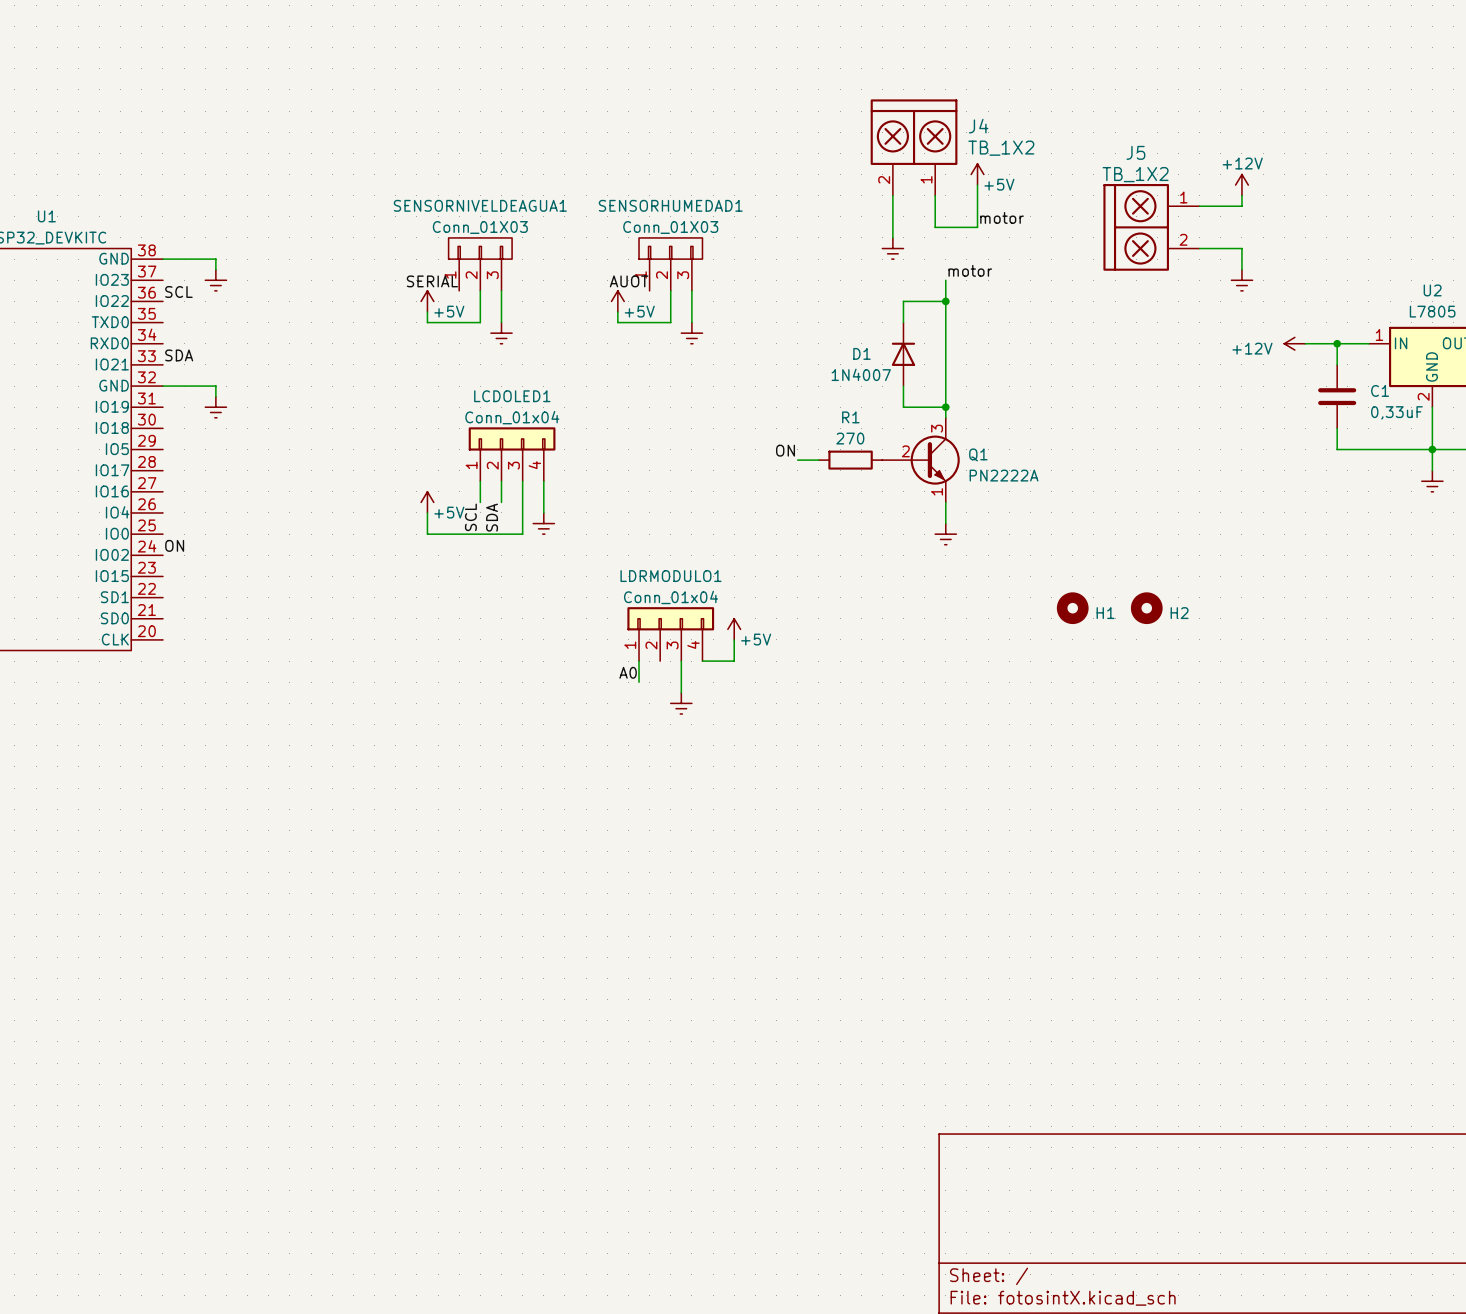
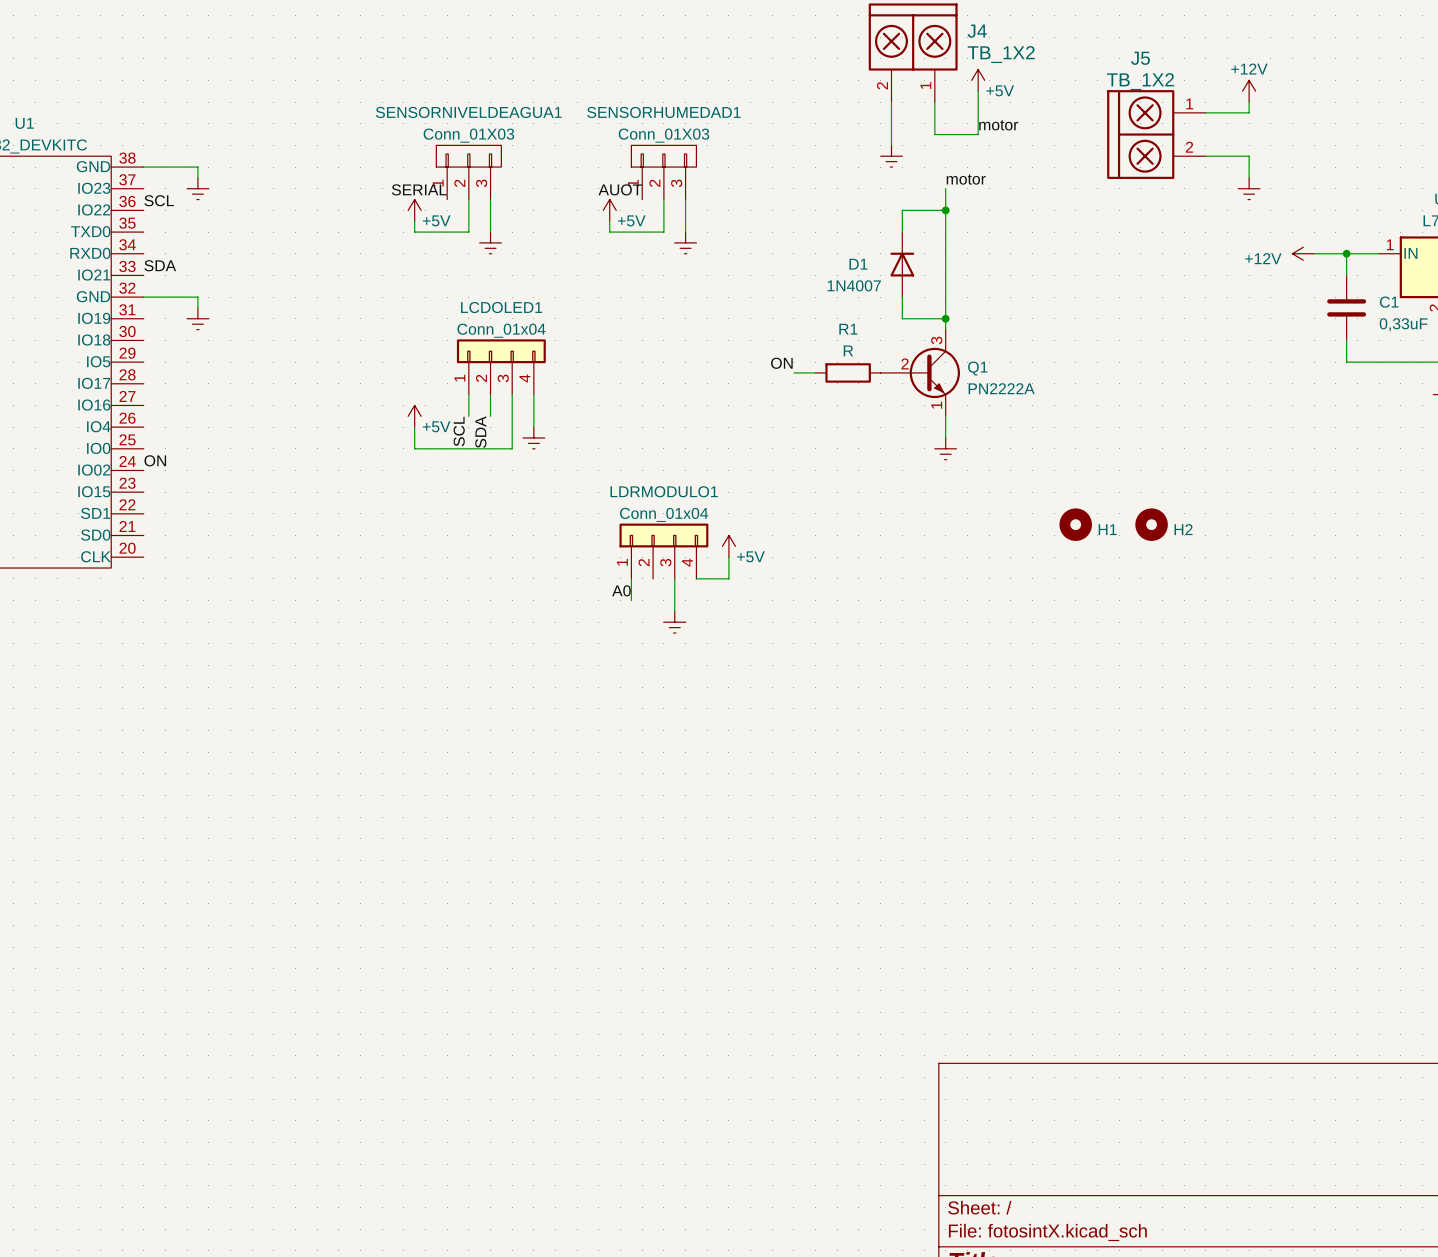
R1 value: 270 (850, 438) -> R (848, 350)

